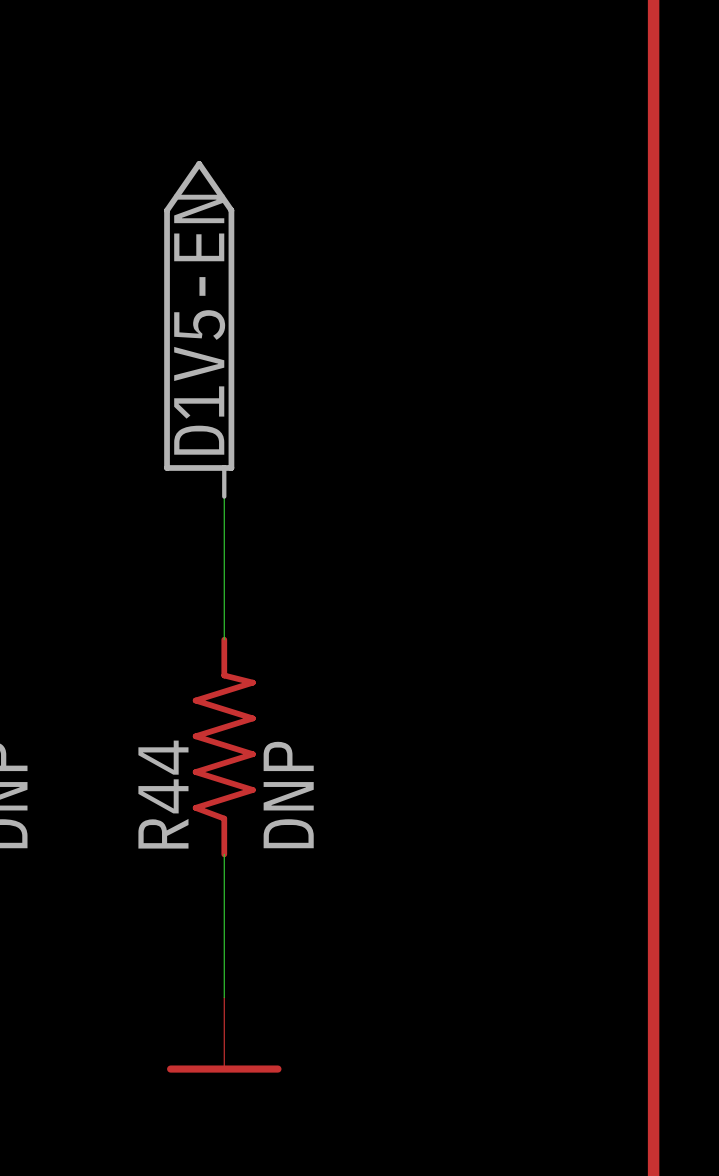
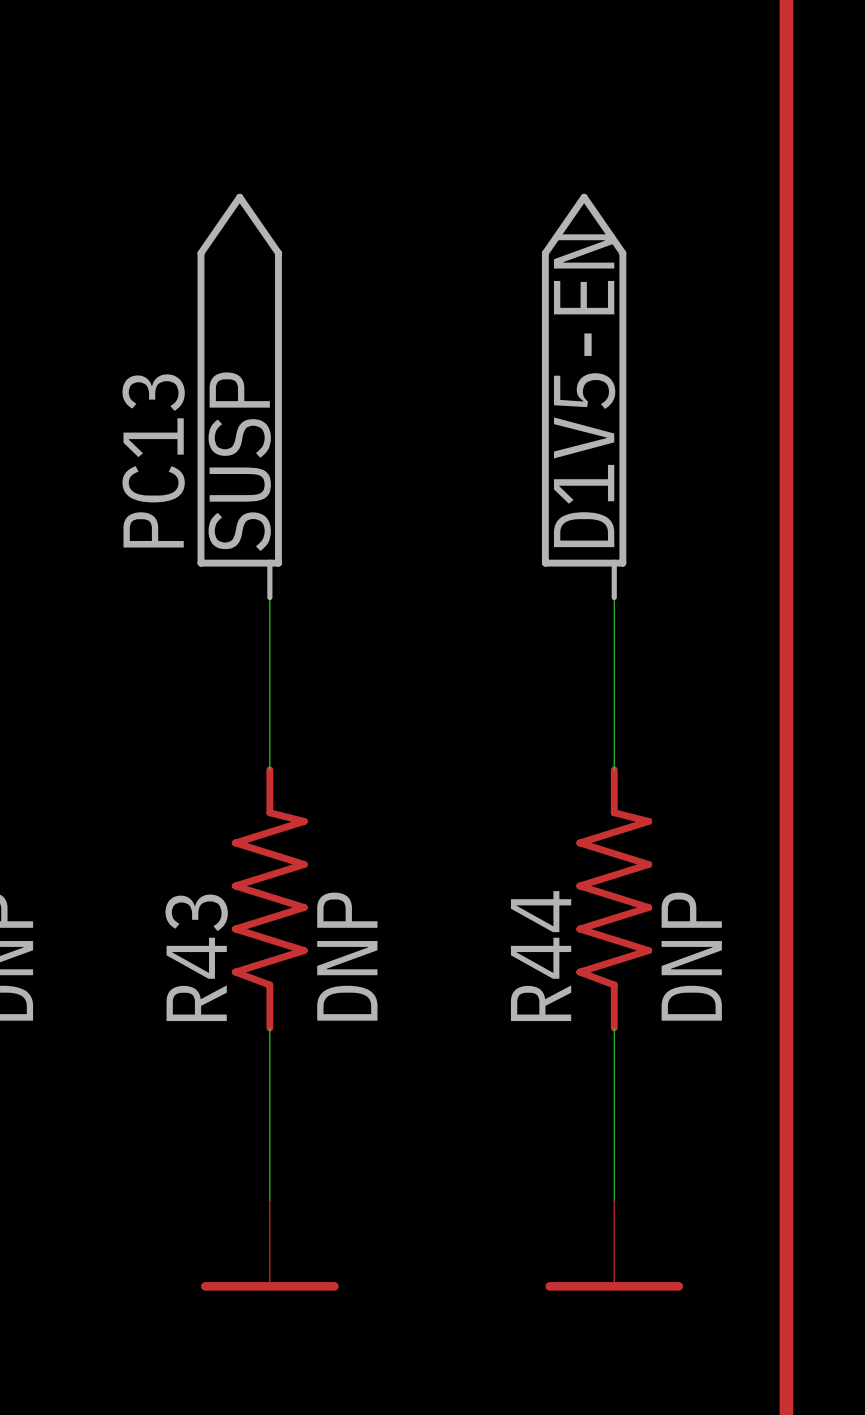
label position: D1V5-EN (199, 324) -> D1V5-EN (584, 390)
part: none -> (584, 396)
label: none -> PC13 (153, 460)
text: none -> SUSP (239, 461)
wire: none -> (614, 597) (614, 769)
R44: none -> DNP (614, 898)
R44 name: R44 (163, 794) -> R43 (196, 957)
wire: none -> (614, 1028) (614, 1200)
power symbol: none -> (614, 1245)

